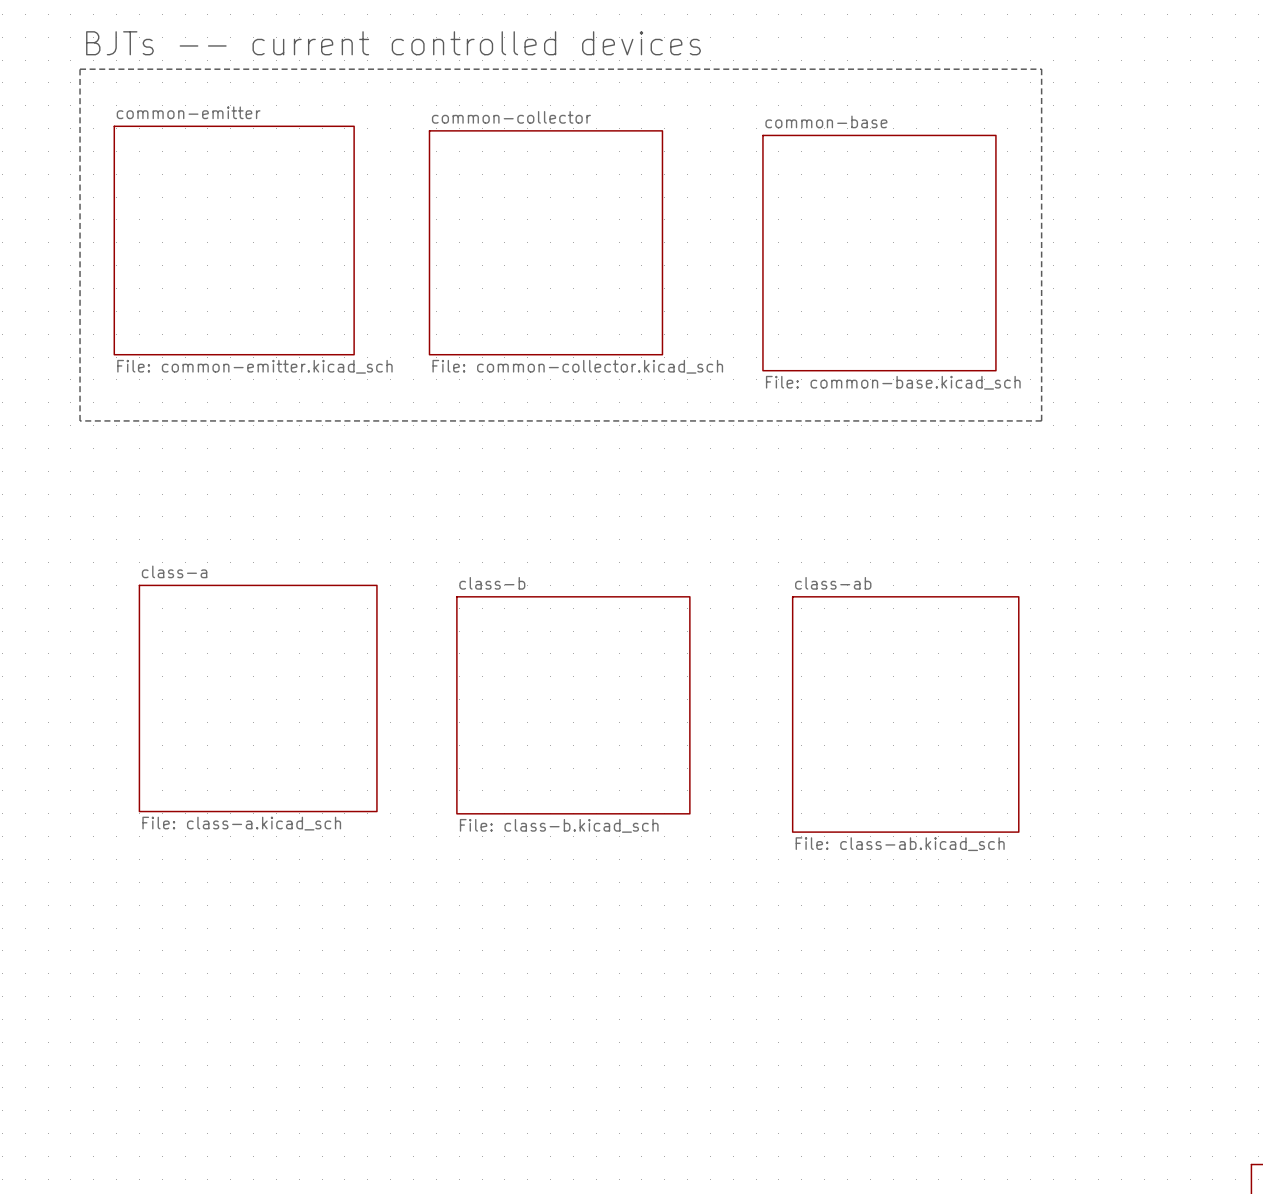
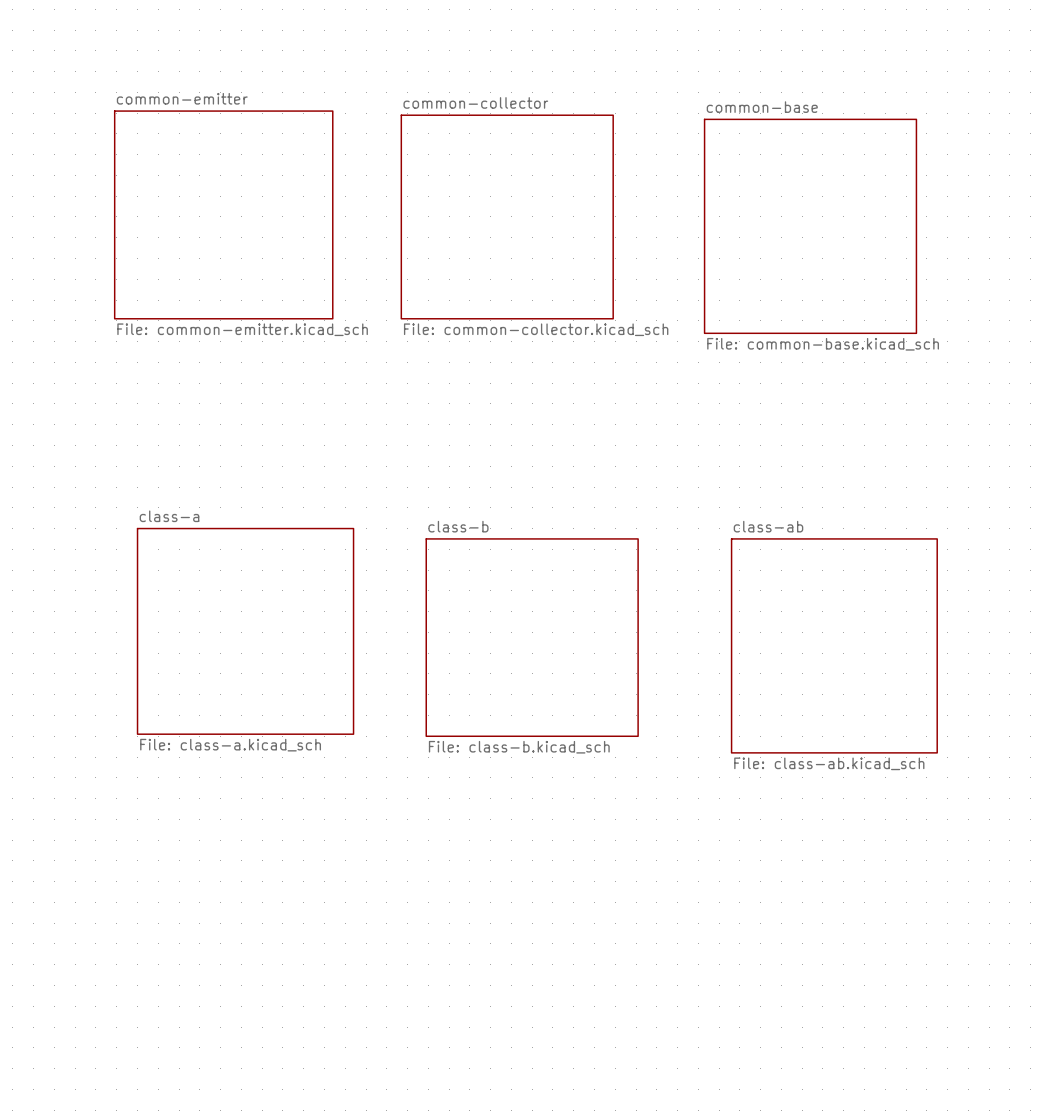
text: BJTs -- current controlled devices (393, 43) -> none
line: (80, 69) (1041, 69) (1041, 420) (80, 420) (80, 69) -> none

